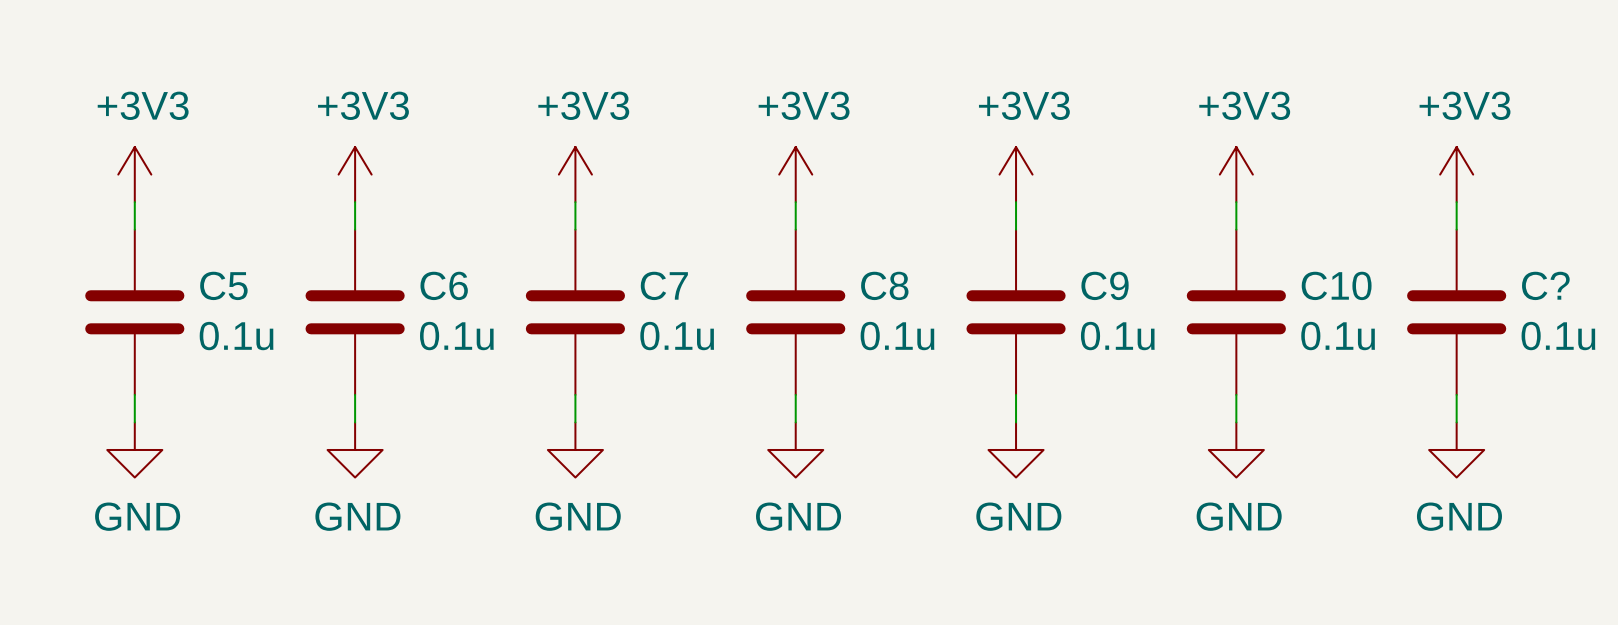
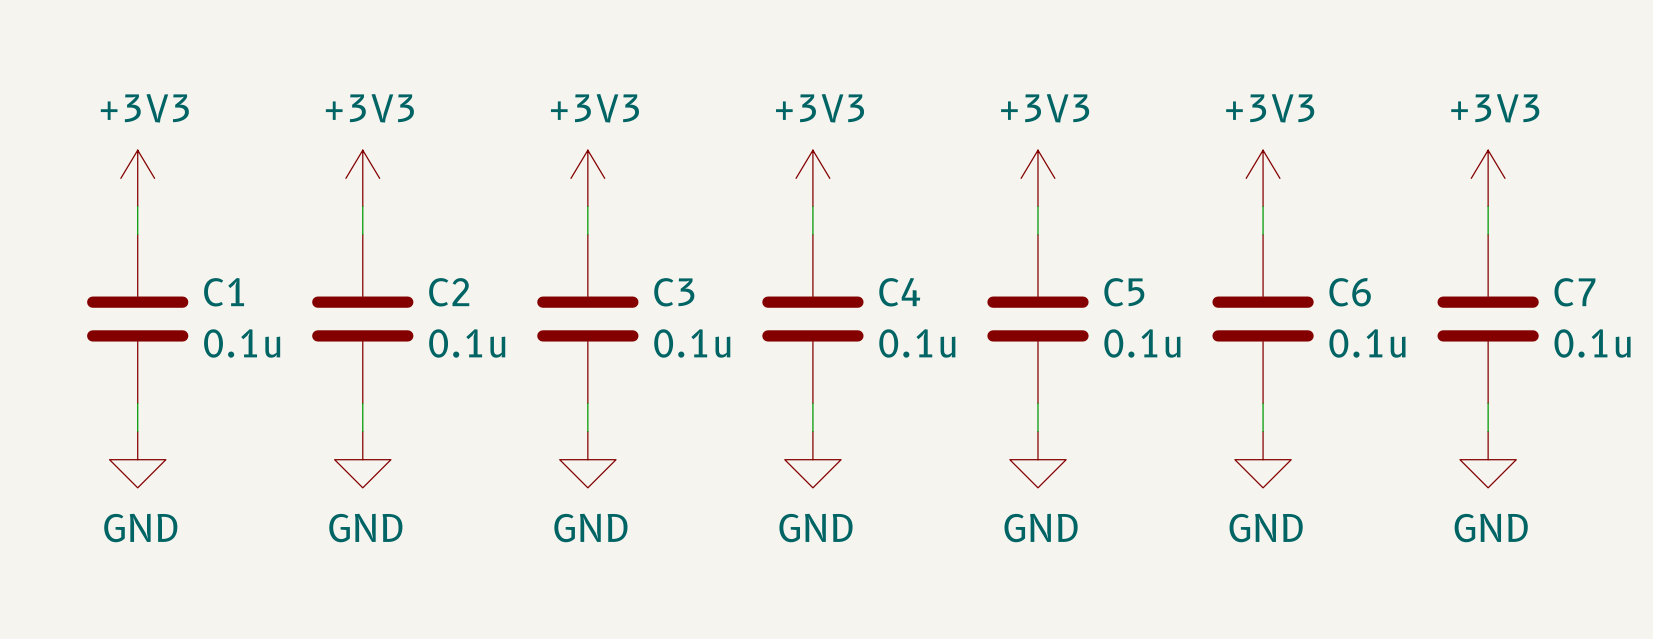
C5 name: C5 (223, 285) -> C1 (224, 292)
C6 name: C6 (444, 285) -> C2 (449, 292)
C7 name: C7 (664, 285) -> C3 (674, 292)
C8 name: C8 (884, 285) -> C4 (899, 292)
C9 name: C9 (1105, 285) -> C5 (1124, 292)
C10 name: C10 (1336, 285) -> C6 (1350, 292)
C? name: C? (1545, 285) -> C7 (1574, 292)

